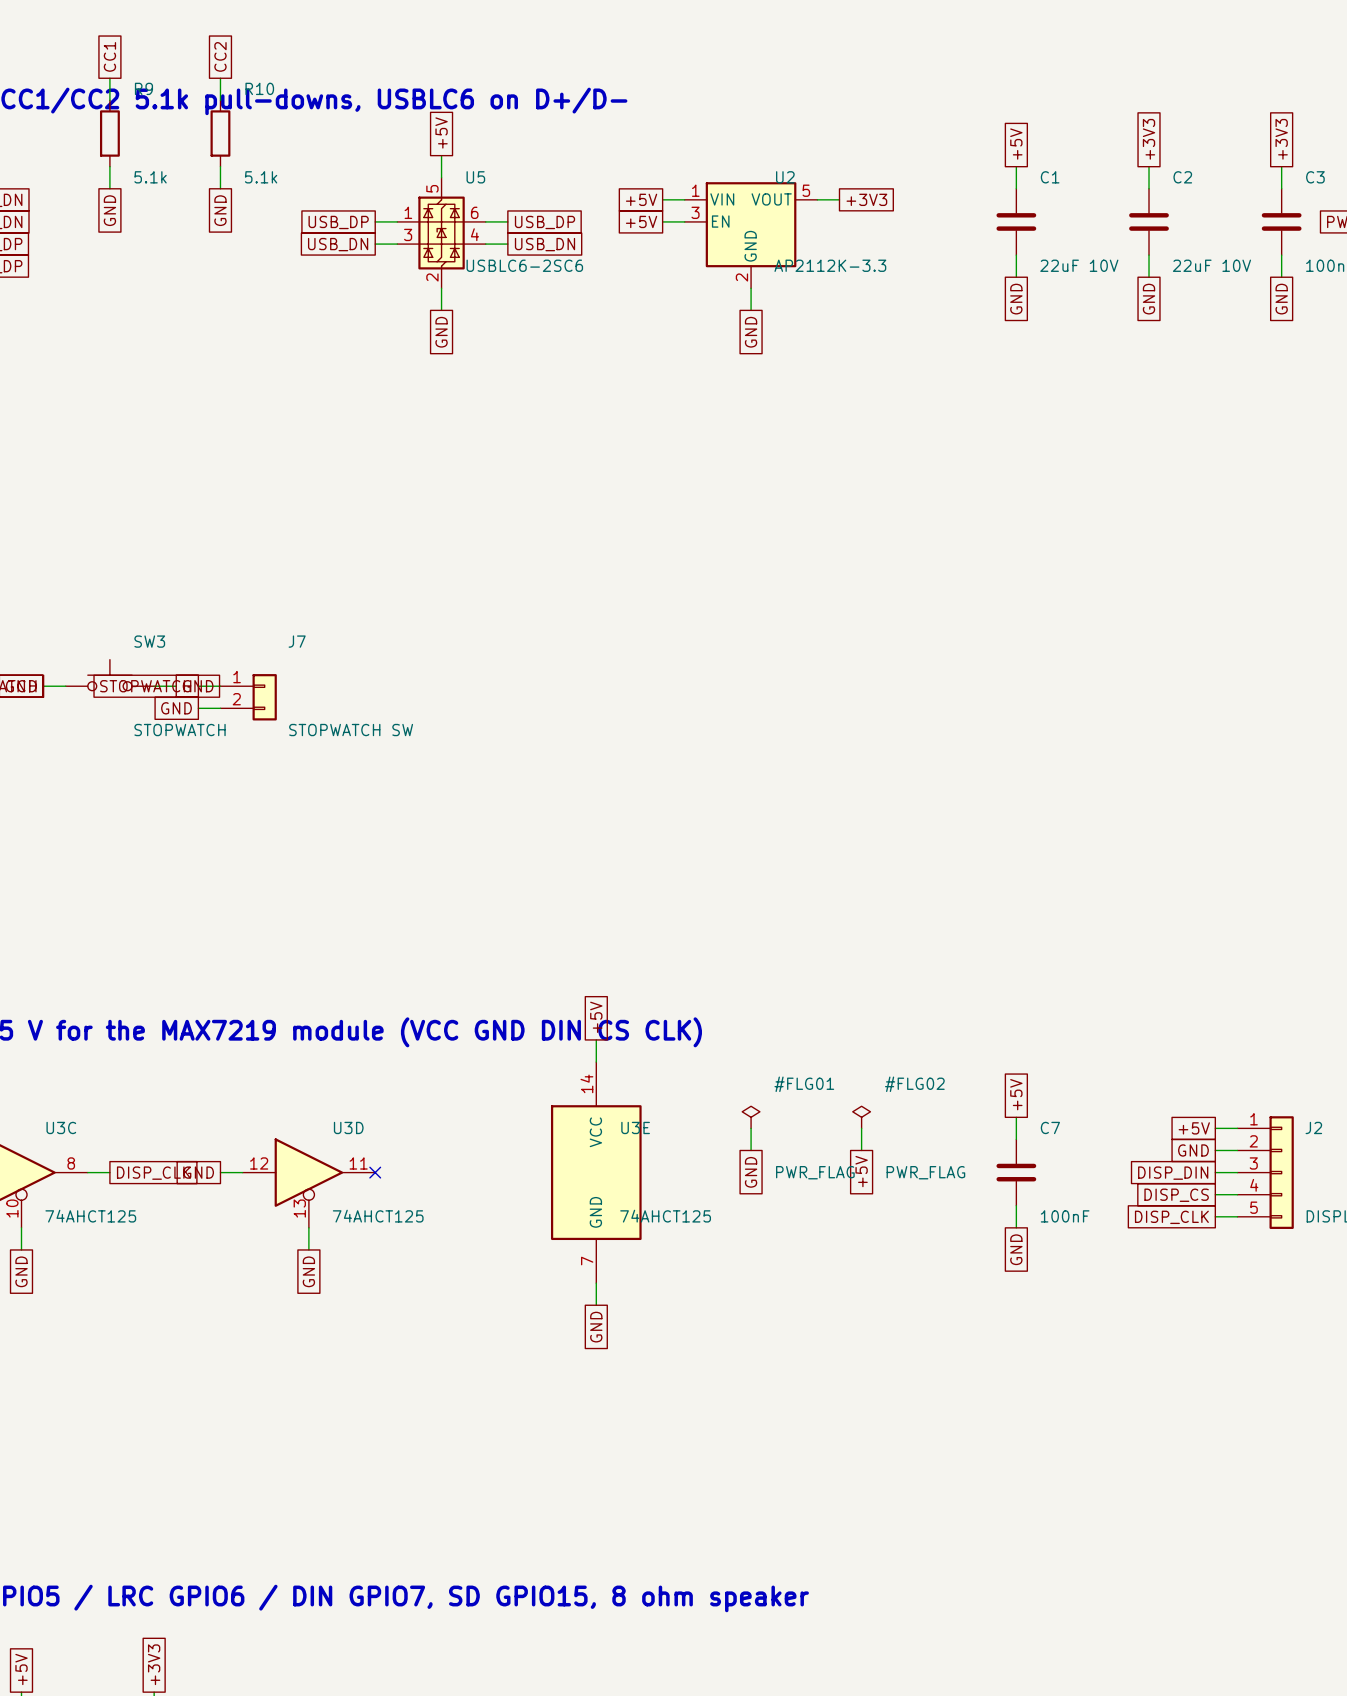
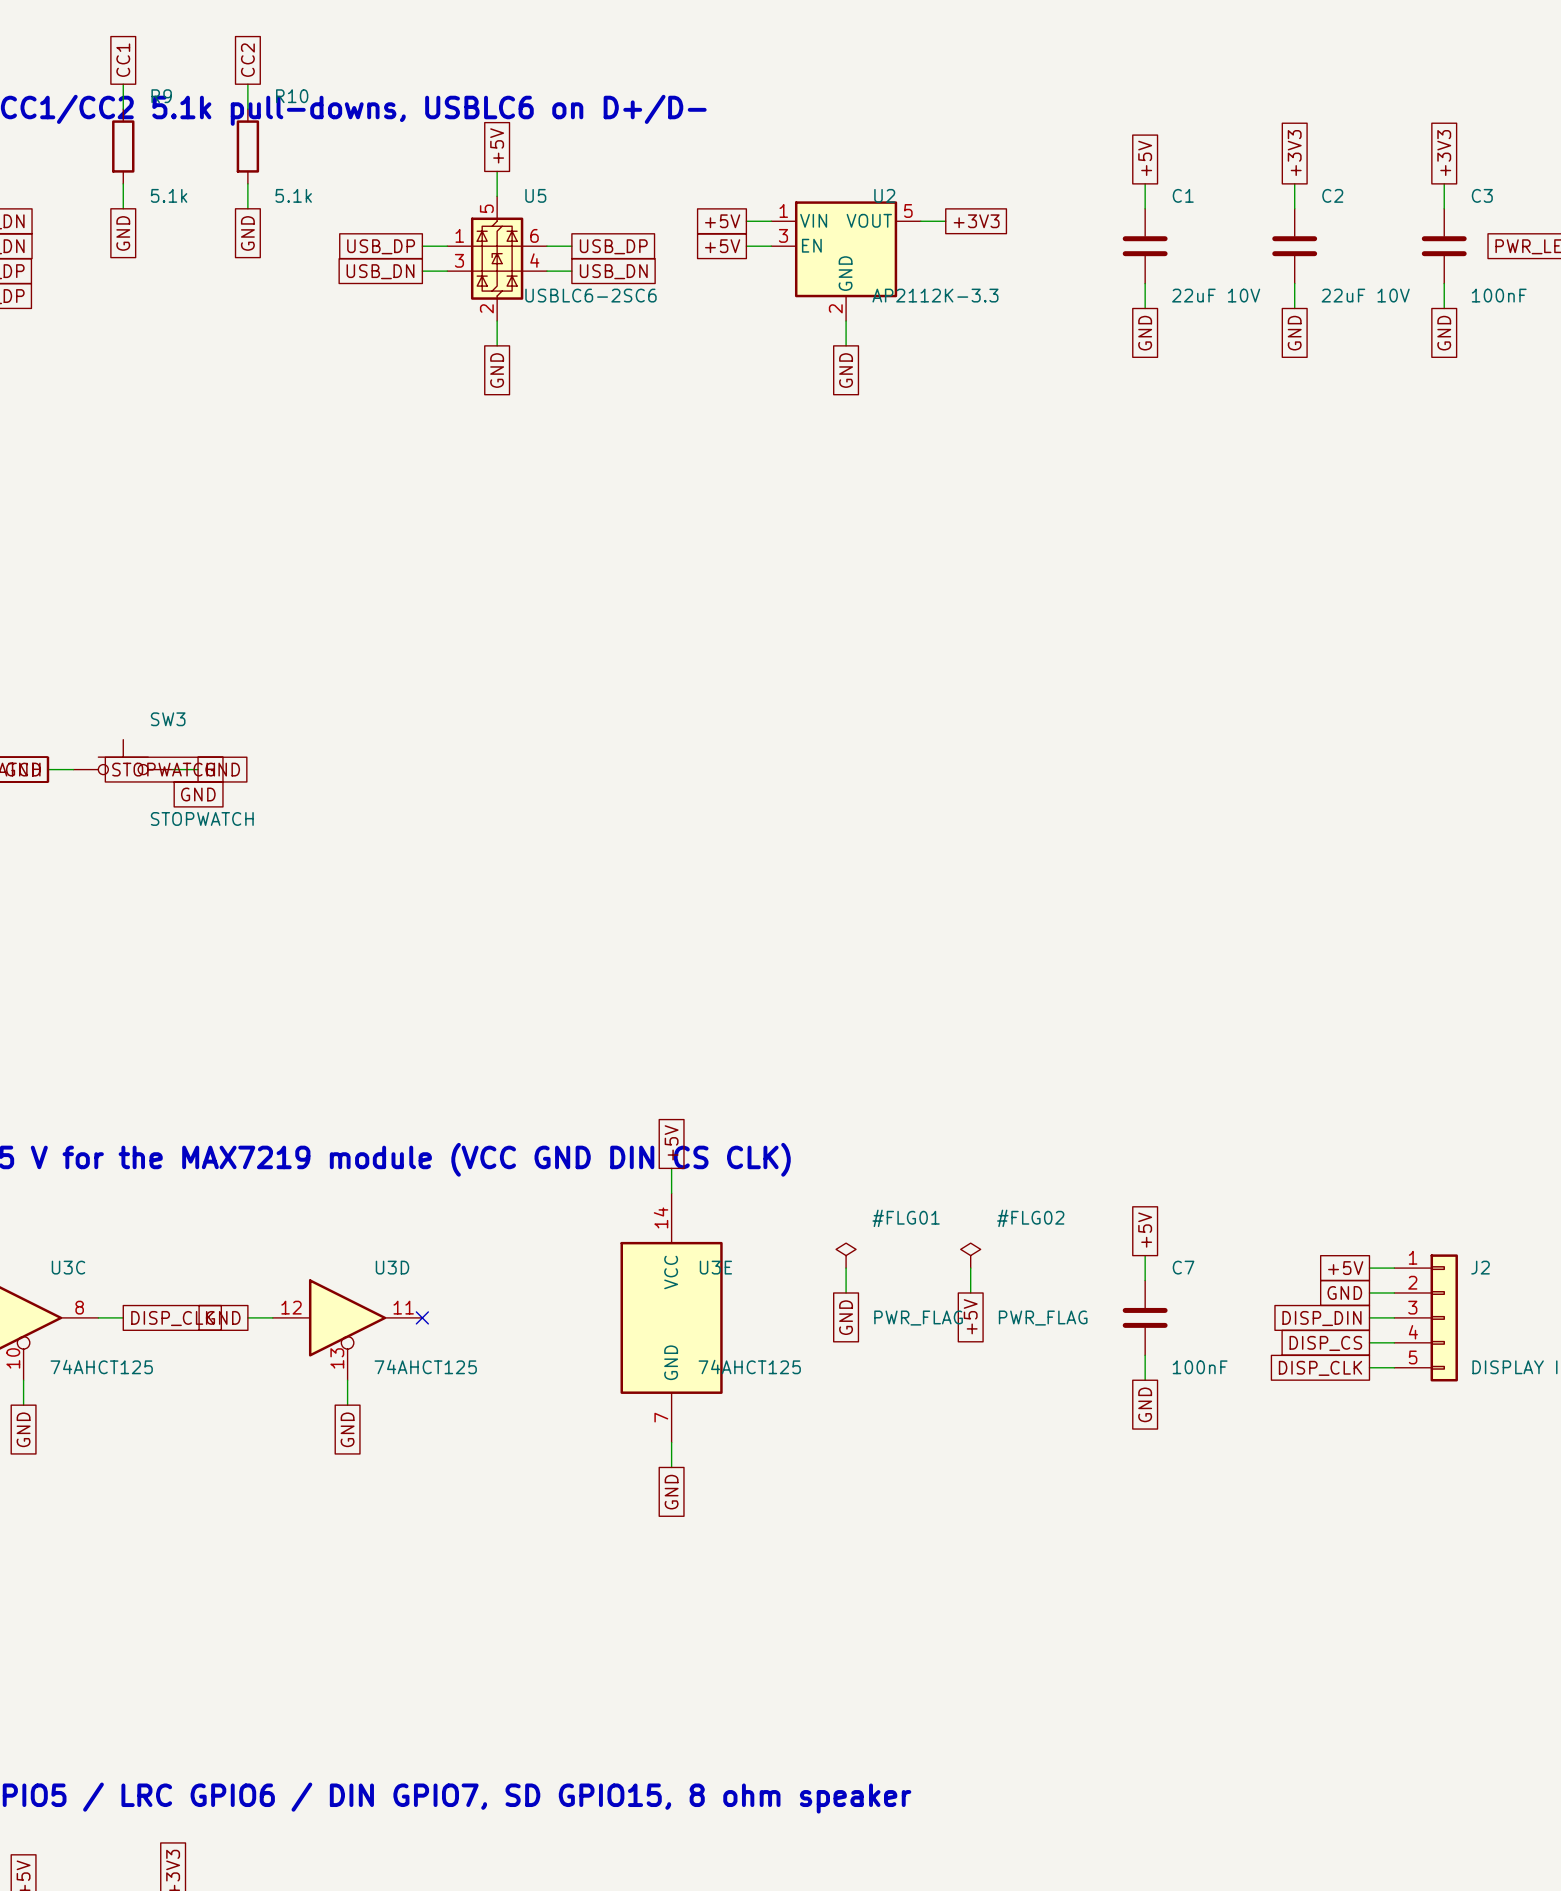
wire: (198, 686) (220, 686) -> none
J7: STOPWATCH SW (248, 697) -> none
wire: (198, 708) (220, 708) -> none

